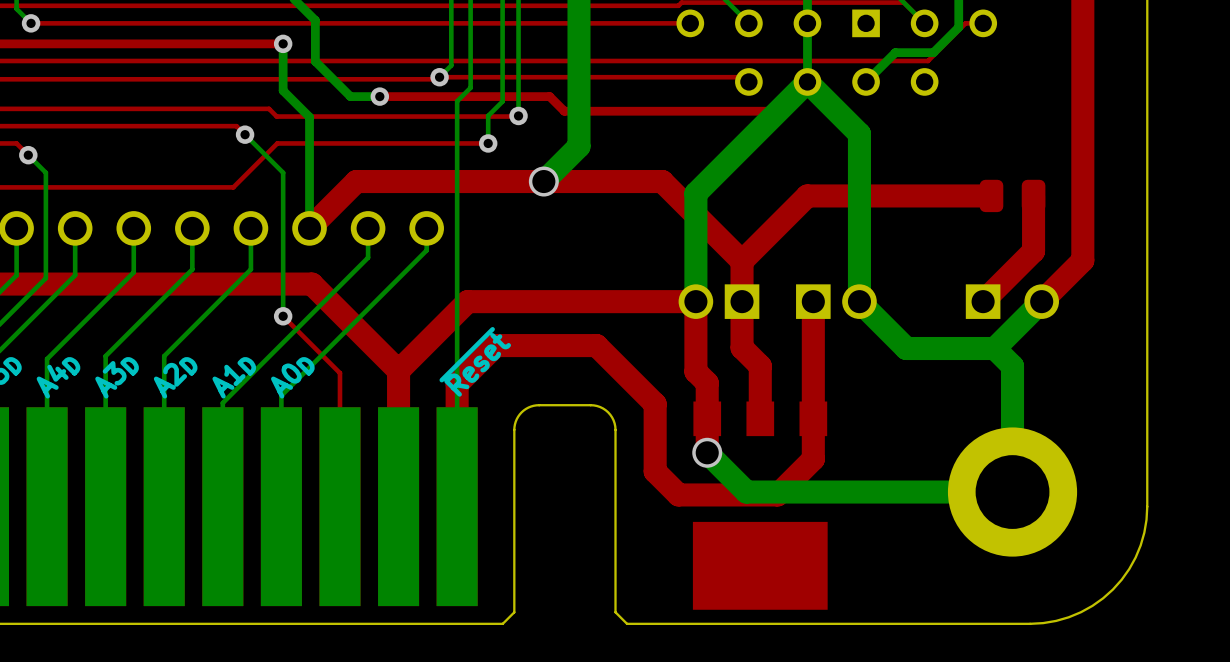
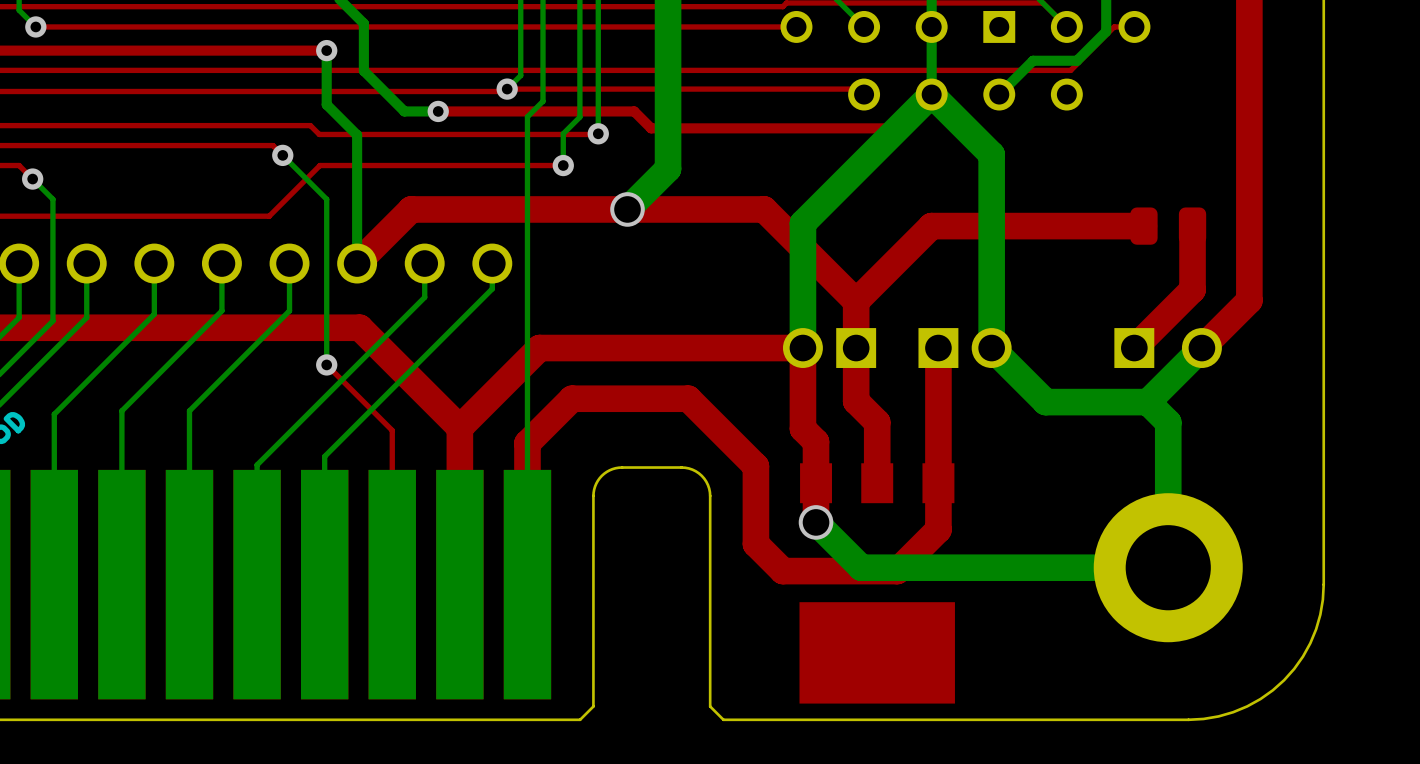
text: ~{Reset} (475, 361) -> none
text: A4D (58, 377) -> none
text: A3D (117, 377) -> none
text: A2D (175, 377) -> none
text: A1D (234, 377) -> none
text: A0D (292, 377) -> none

